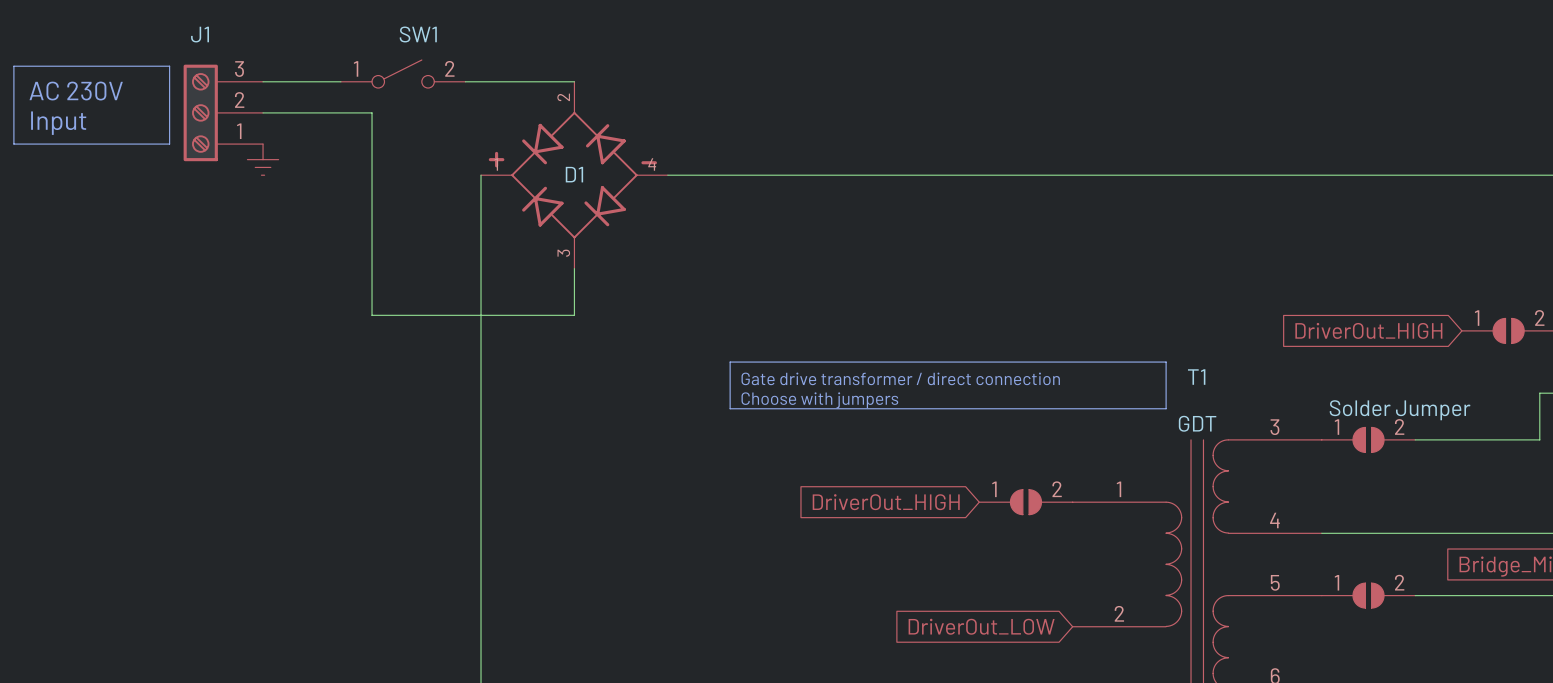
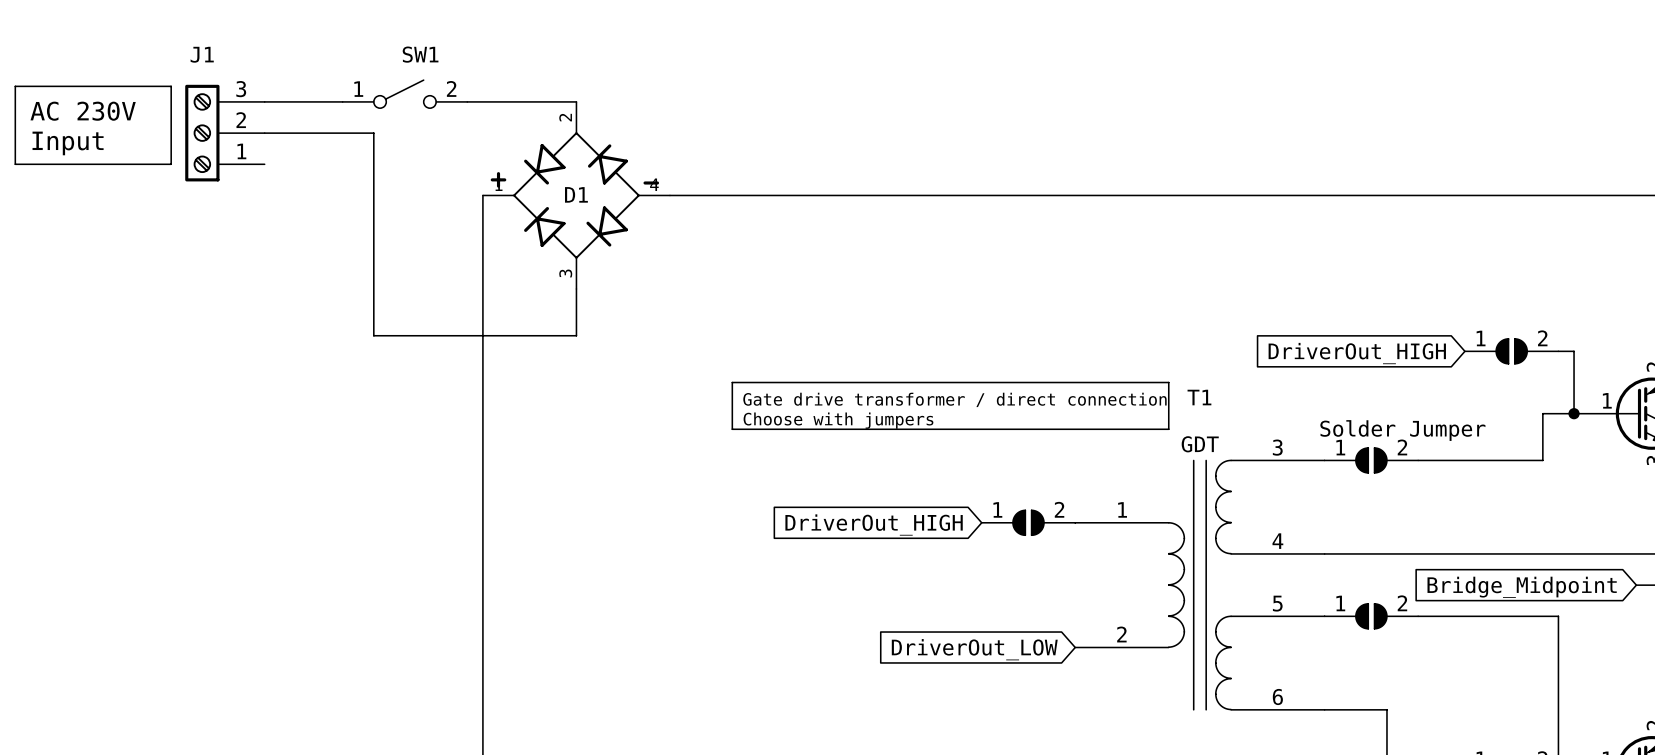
power symbol: (263, 159) -> none

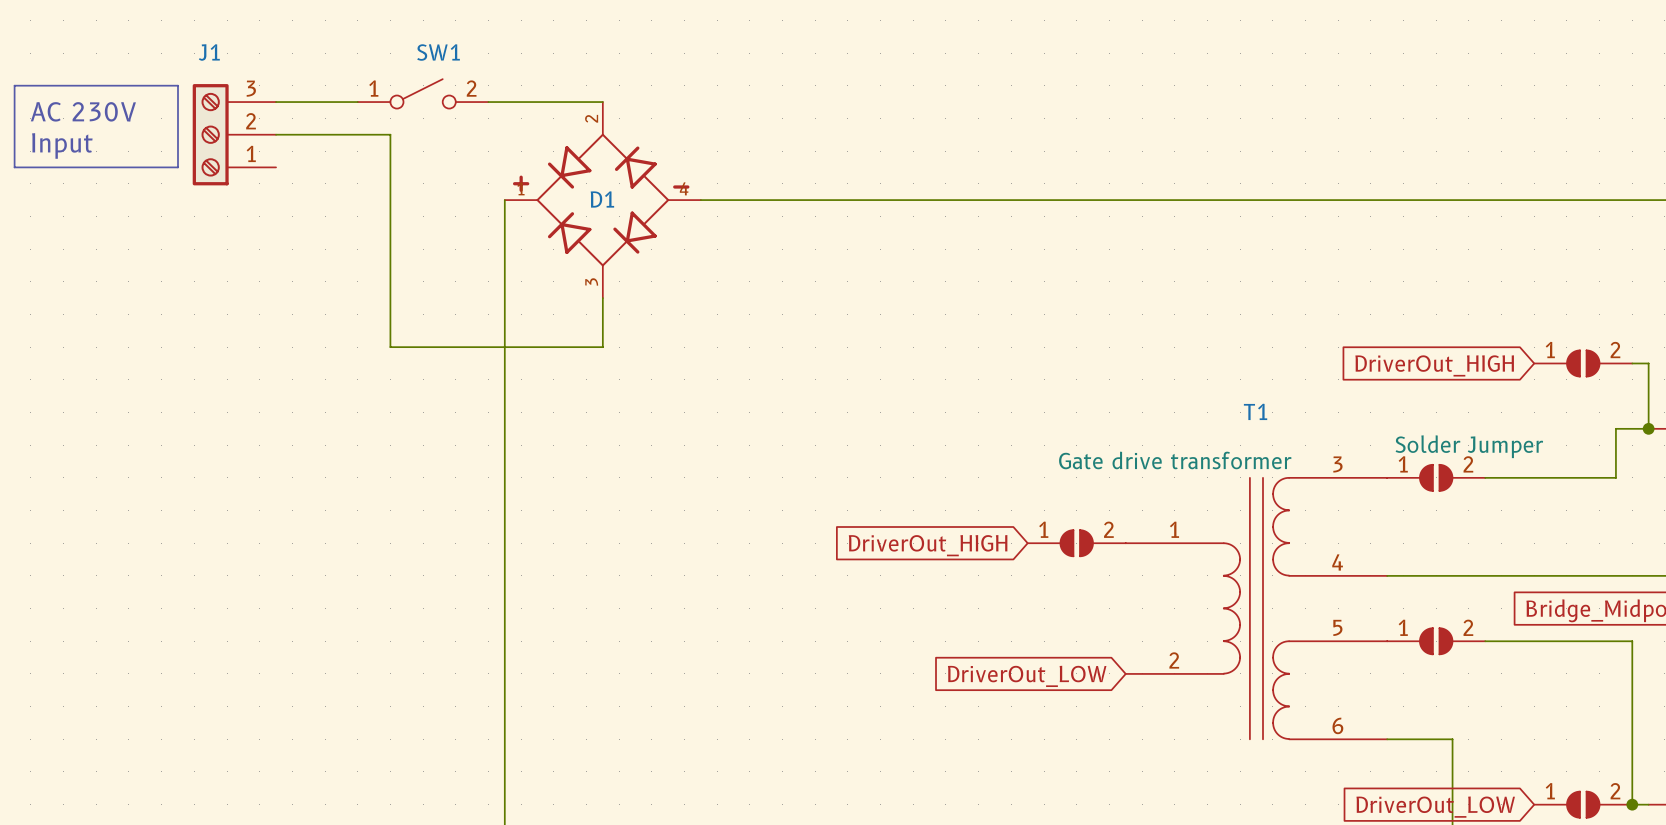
line: (732, 382) (1168, 382) (1168, 429) (732, 429) (732, 382) -> none
text: Gate drive transformer / direct connection (954, 399) -> none
text: Choose with jumpers (838, 420) -> none
T1 value: GDT (1200, 444) -> Gate drive transformer (1175, 460)

